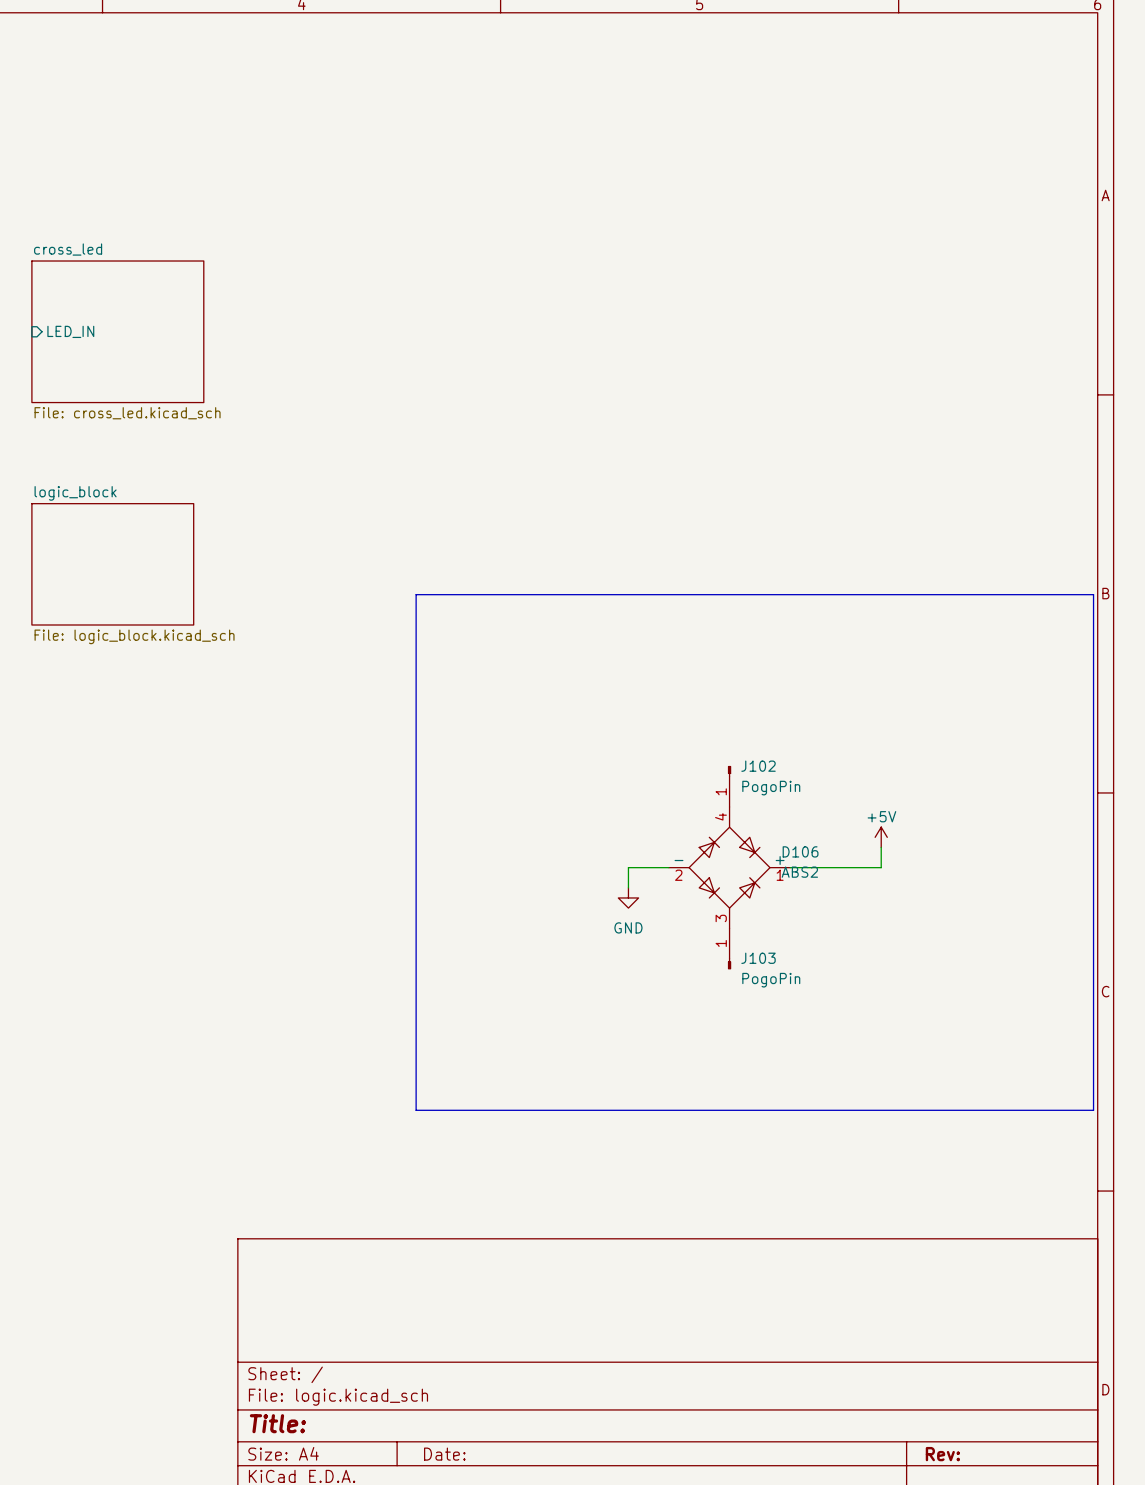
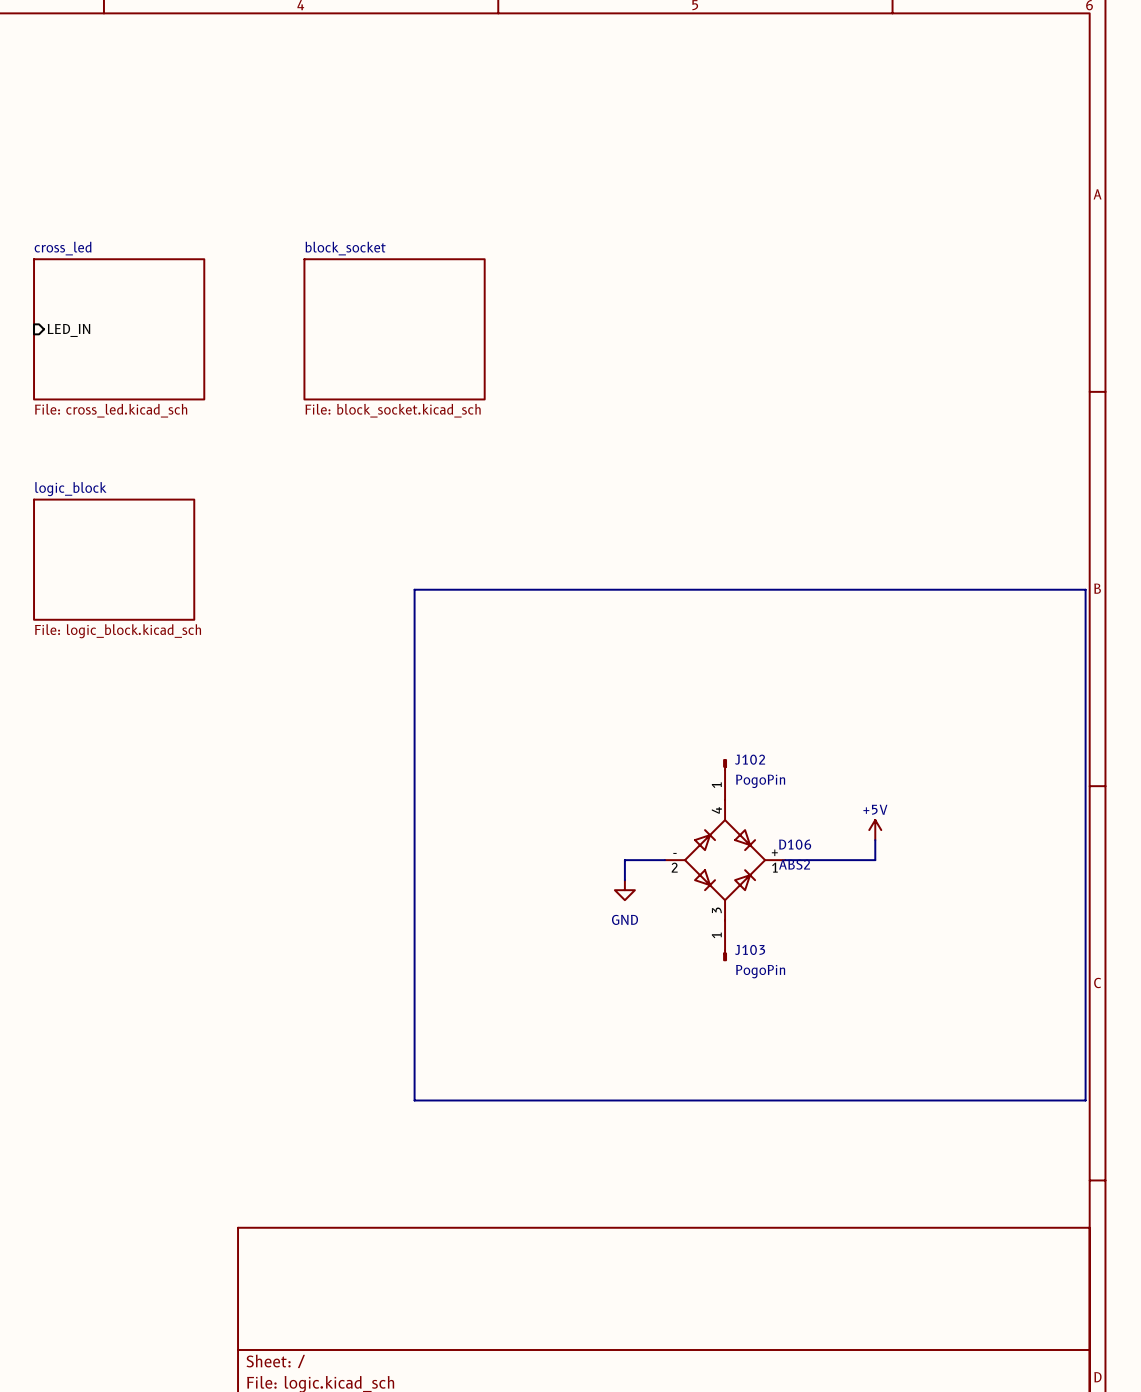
sheet block_socket: none -> File: block_socket.kicad_sch (394, 329)

